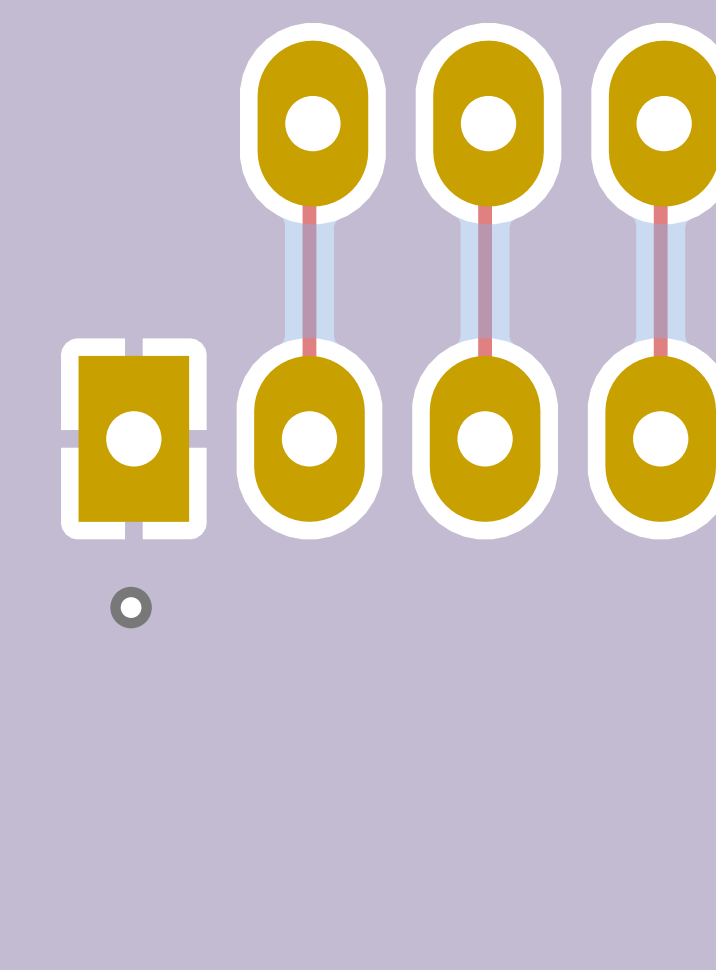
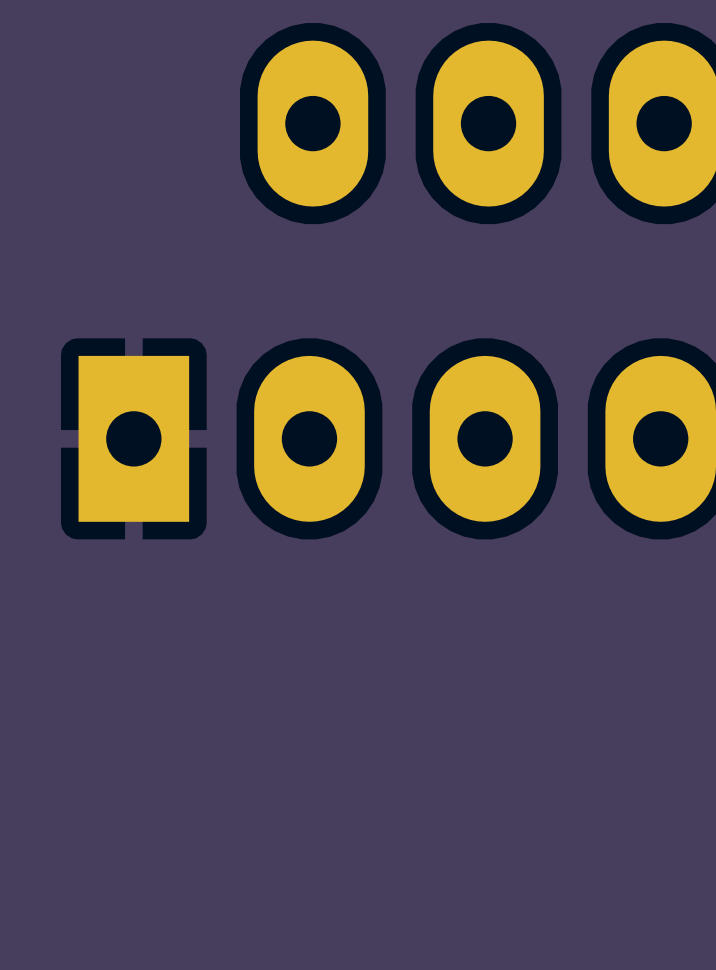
top track: (312, 123) (309, 127) (309, 438) -> none
top track: (488, 123) (485, 127) (485, 438) -> none
top track: (664, 123) (660, 127) (660, 438) -> none
via: (131, 607) -> none

